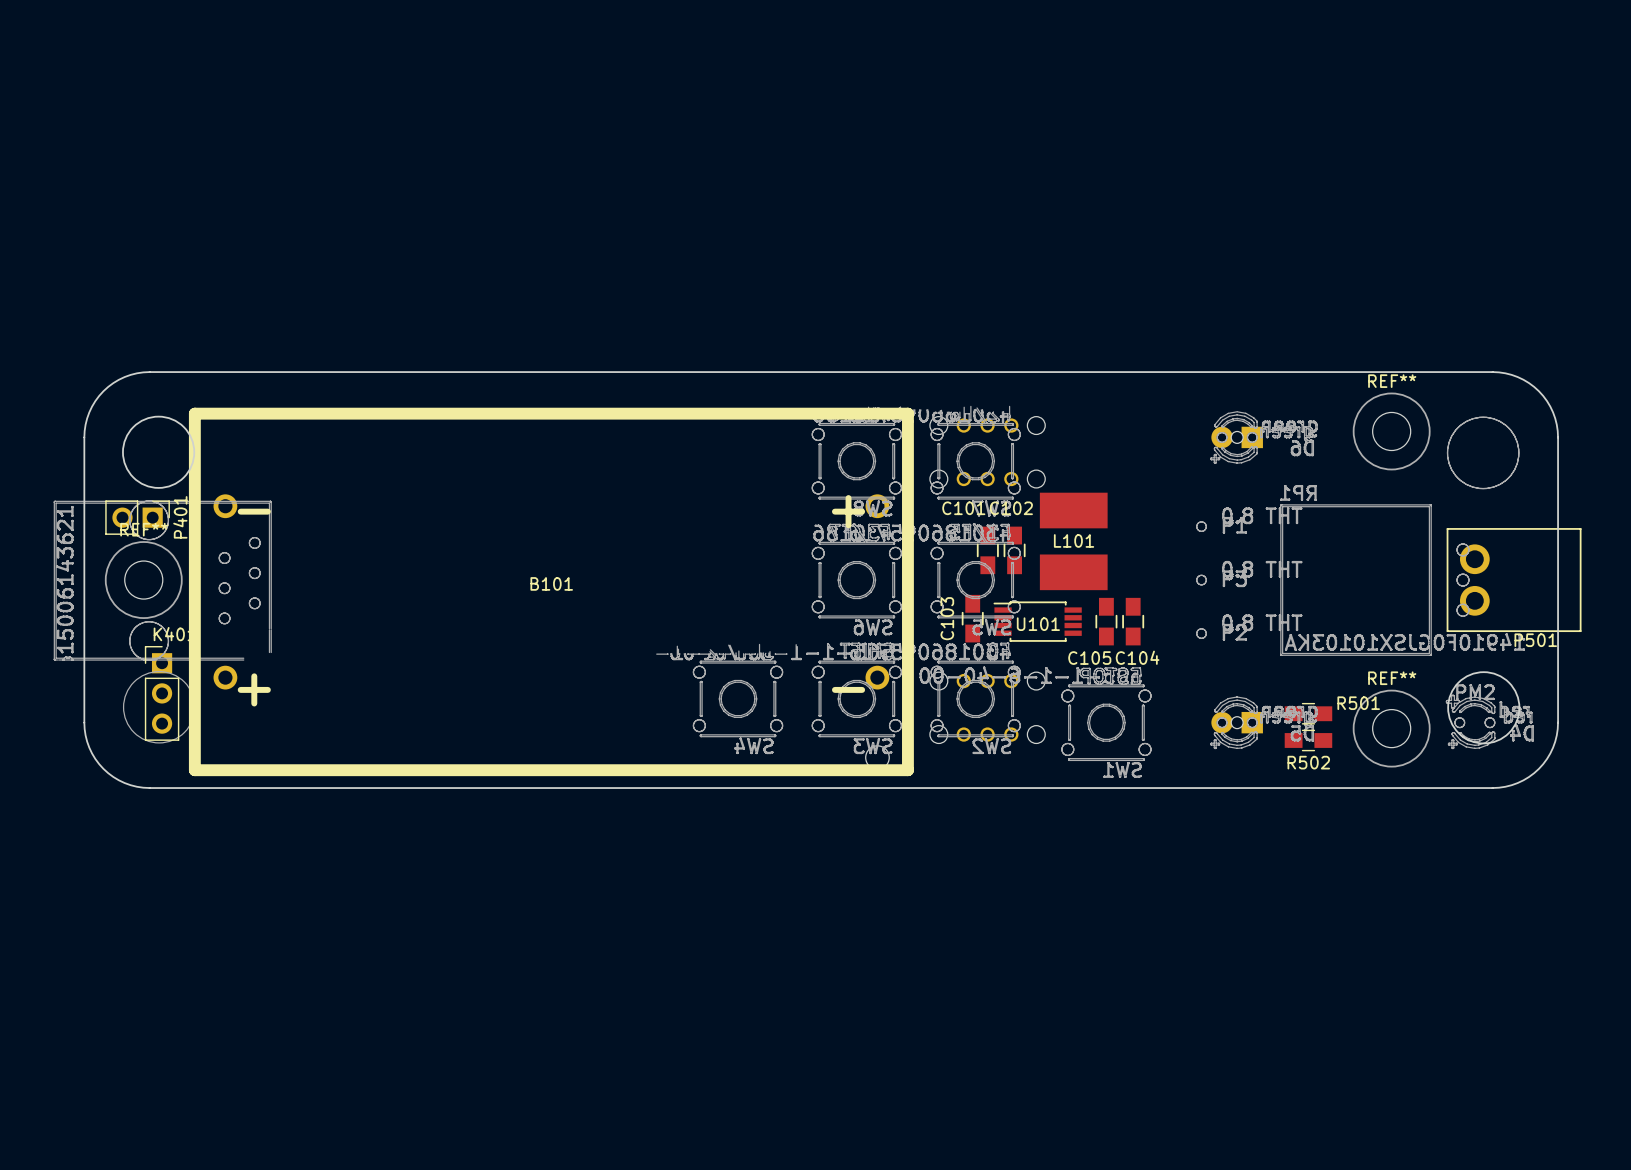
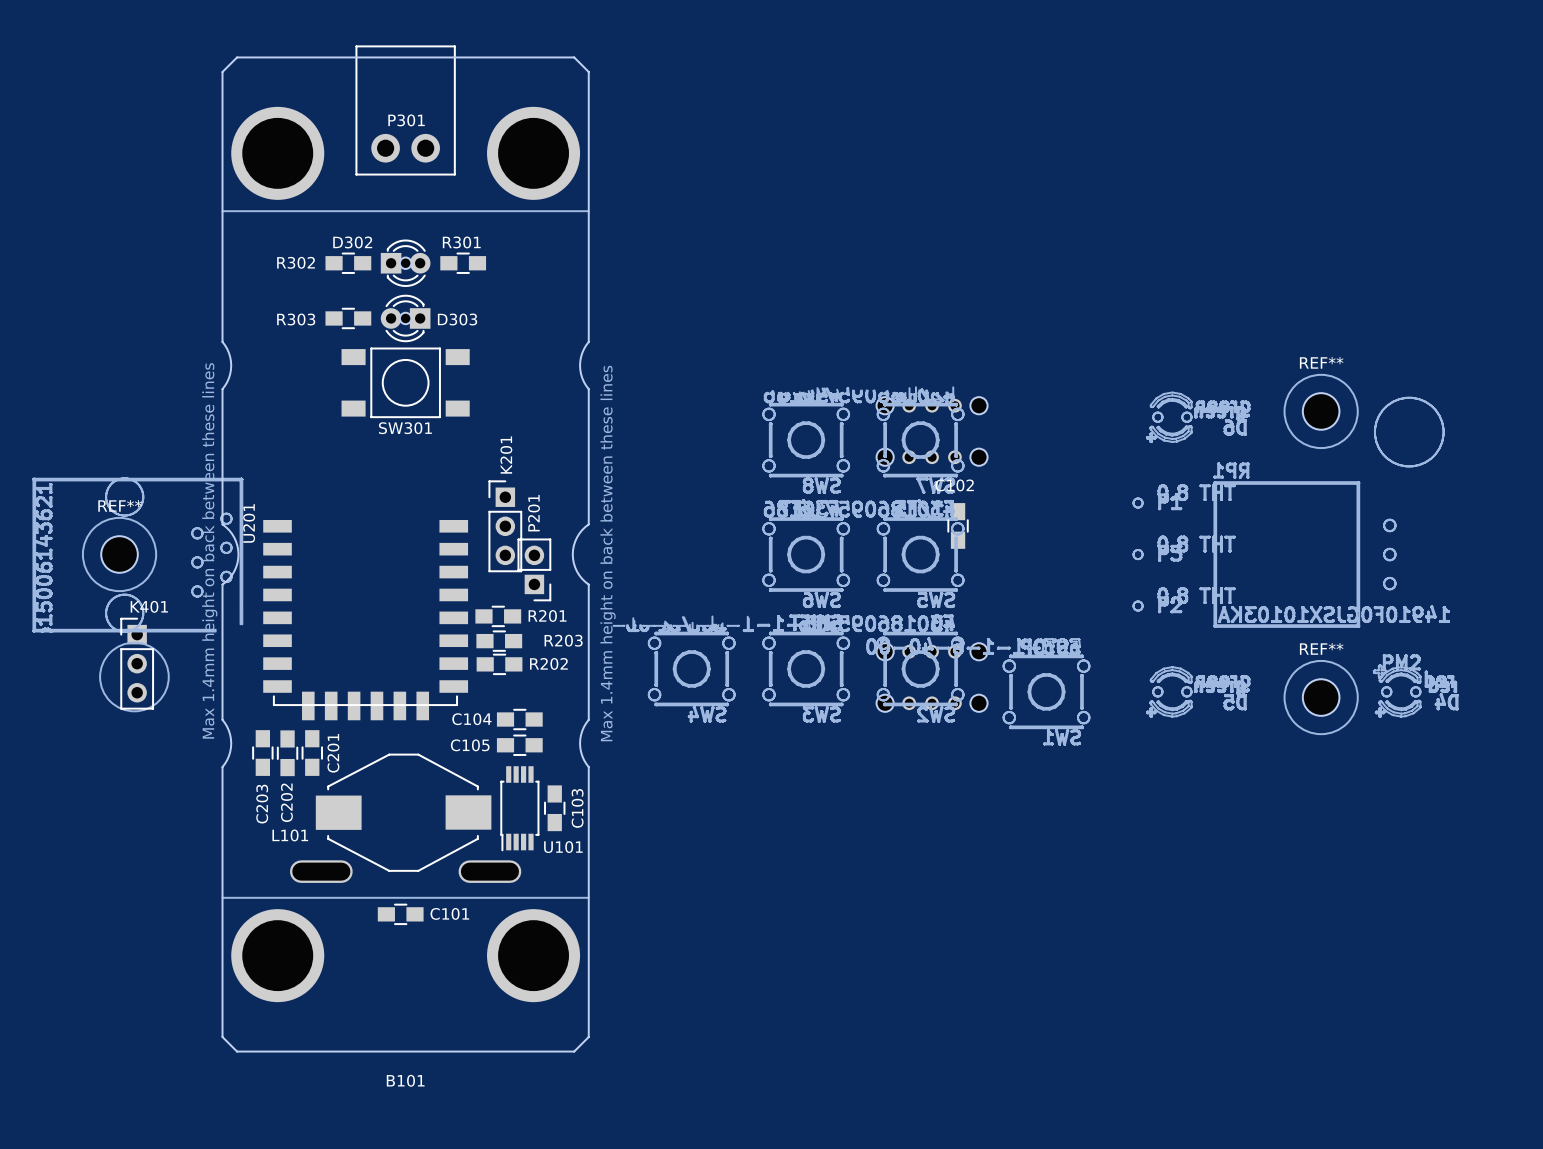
P301: none -> (405, 110)
R302: none -> (348, 263)
D302: none -> (405, 263)
R301: none -> (463, 263)
R303: none -> (348, 318)
D303: none -> (405, 318)
board edge: (149, 372) (1492, 372) (1511, 374) (1529, 383) (1543, 395) (1553, 412) (1557, 431) (1558, 722) (1555, 741) (1547, 758) (1534, 773) (1517, 783) (1492, 788) (149, 788) (130, 785) (113, 777) (99, 764) (89, 747) (84, 729) (84, 437) (89, 412) (103, 391) (124, 377) (149, 372) -> none
SW301: none -> (405, 382)
B101 footprint: [188, 407, 914, 777] -> [221, 56, 590, 1053]
round board edge: [122, 415, 196, 489] -> none
part: (1237, 437) -> none
L101 footprint: [1039, 492, 1108, 591] -> [315, 753, 492, 872]
C101 name position: C101 (963, 508) -> C101 (449, 913)
P401: (137, 517) -> none
L101 name position: L101 (1074, 540) -> L101 (290, 835)
K201: none -> (505, 526)
C101 rotation: 0° (987, 550) -> 90° clockwise (400, 914)
C101 position: (987, 550) -> (400, 914)
P501: (1514, 580) -> none
B101 name position: B101 (551, 583) -> B101 (405, 1080)
P201: none -> (534, 569)
C103 name position: C103 (947, 618) -> C103 (577, 808)
C103 position: (972, 618) -> (554, 808)
U101 rotation: 0° (1037, 621) -> 90° counterclockwise (519, 808)
U101 position: (1037, 621) -> (519, 808)
C105 rotation: 0° (1106, 621) -> 90° clockwise (519, 745)
C105 position: (1106, 621) -> (519, 745)
C104 rotation: 0° (1133, 621) -> 90° clockwise (519, 719)
C104 position: (1133, 621) -> (519, 719)
U101 name position: U101 (1038, 624) -> U101 (563, 847)
R201: none -> (498, 616)
U201: none -> (365, 620)
R203: none -> (499, 641)
round board edge: [1447, 671, 1521, 745] -> none
R202: none -> (499, 664)
R501: (1308, 713) -> none
part: (1237, 722) -> none
R502: (1308, 740) -> none
C203: none -> (262, 753)
C202: none -> (287, 753)
C201: none -> (312, 753)

